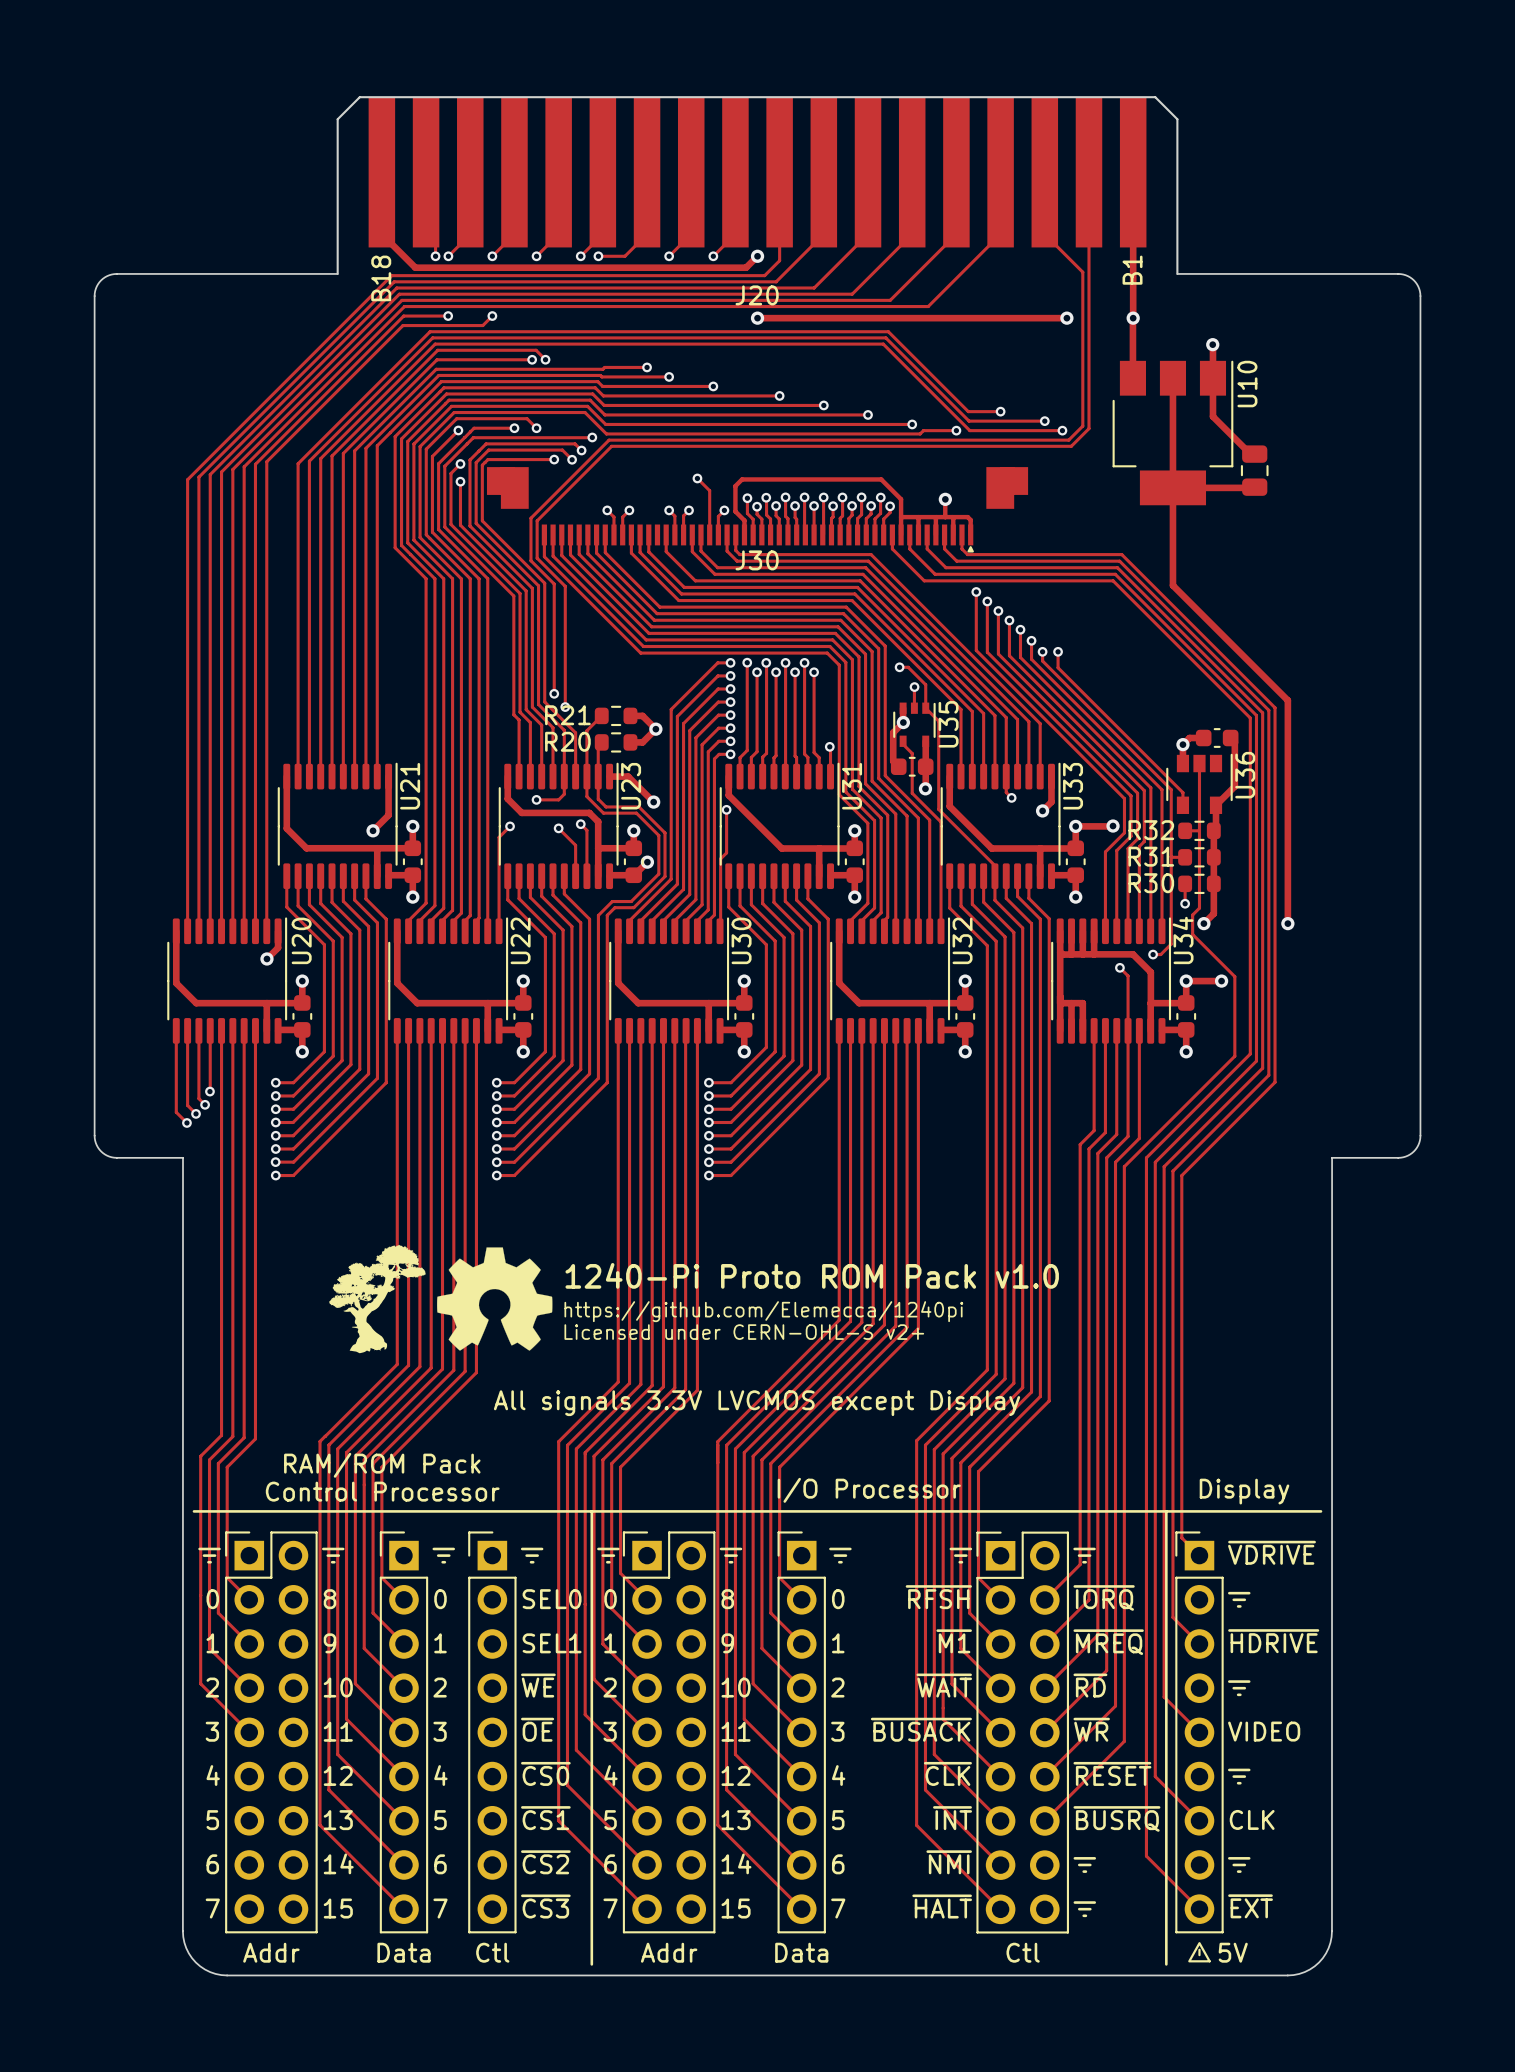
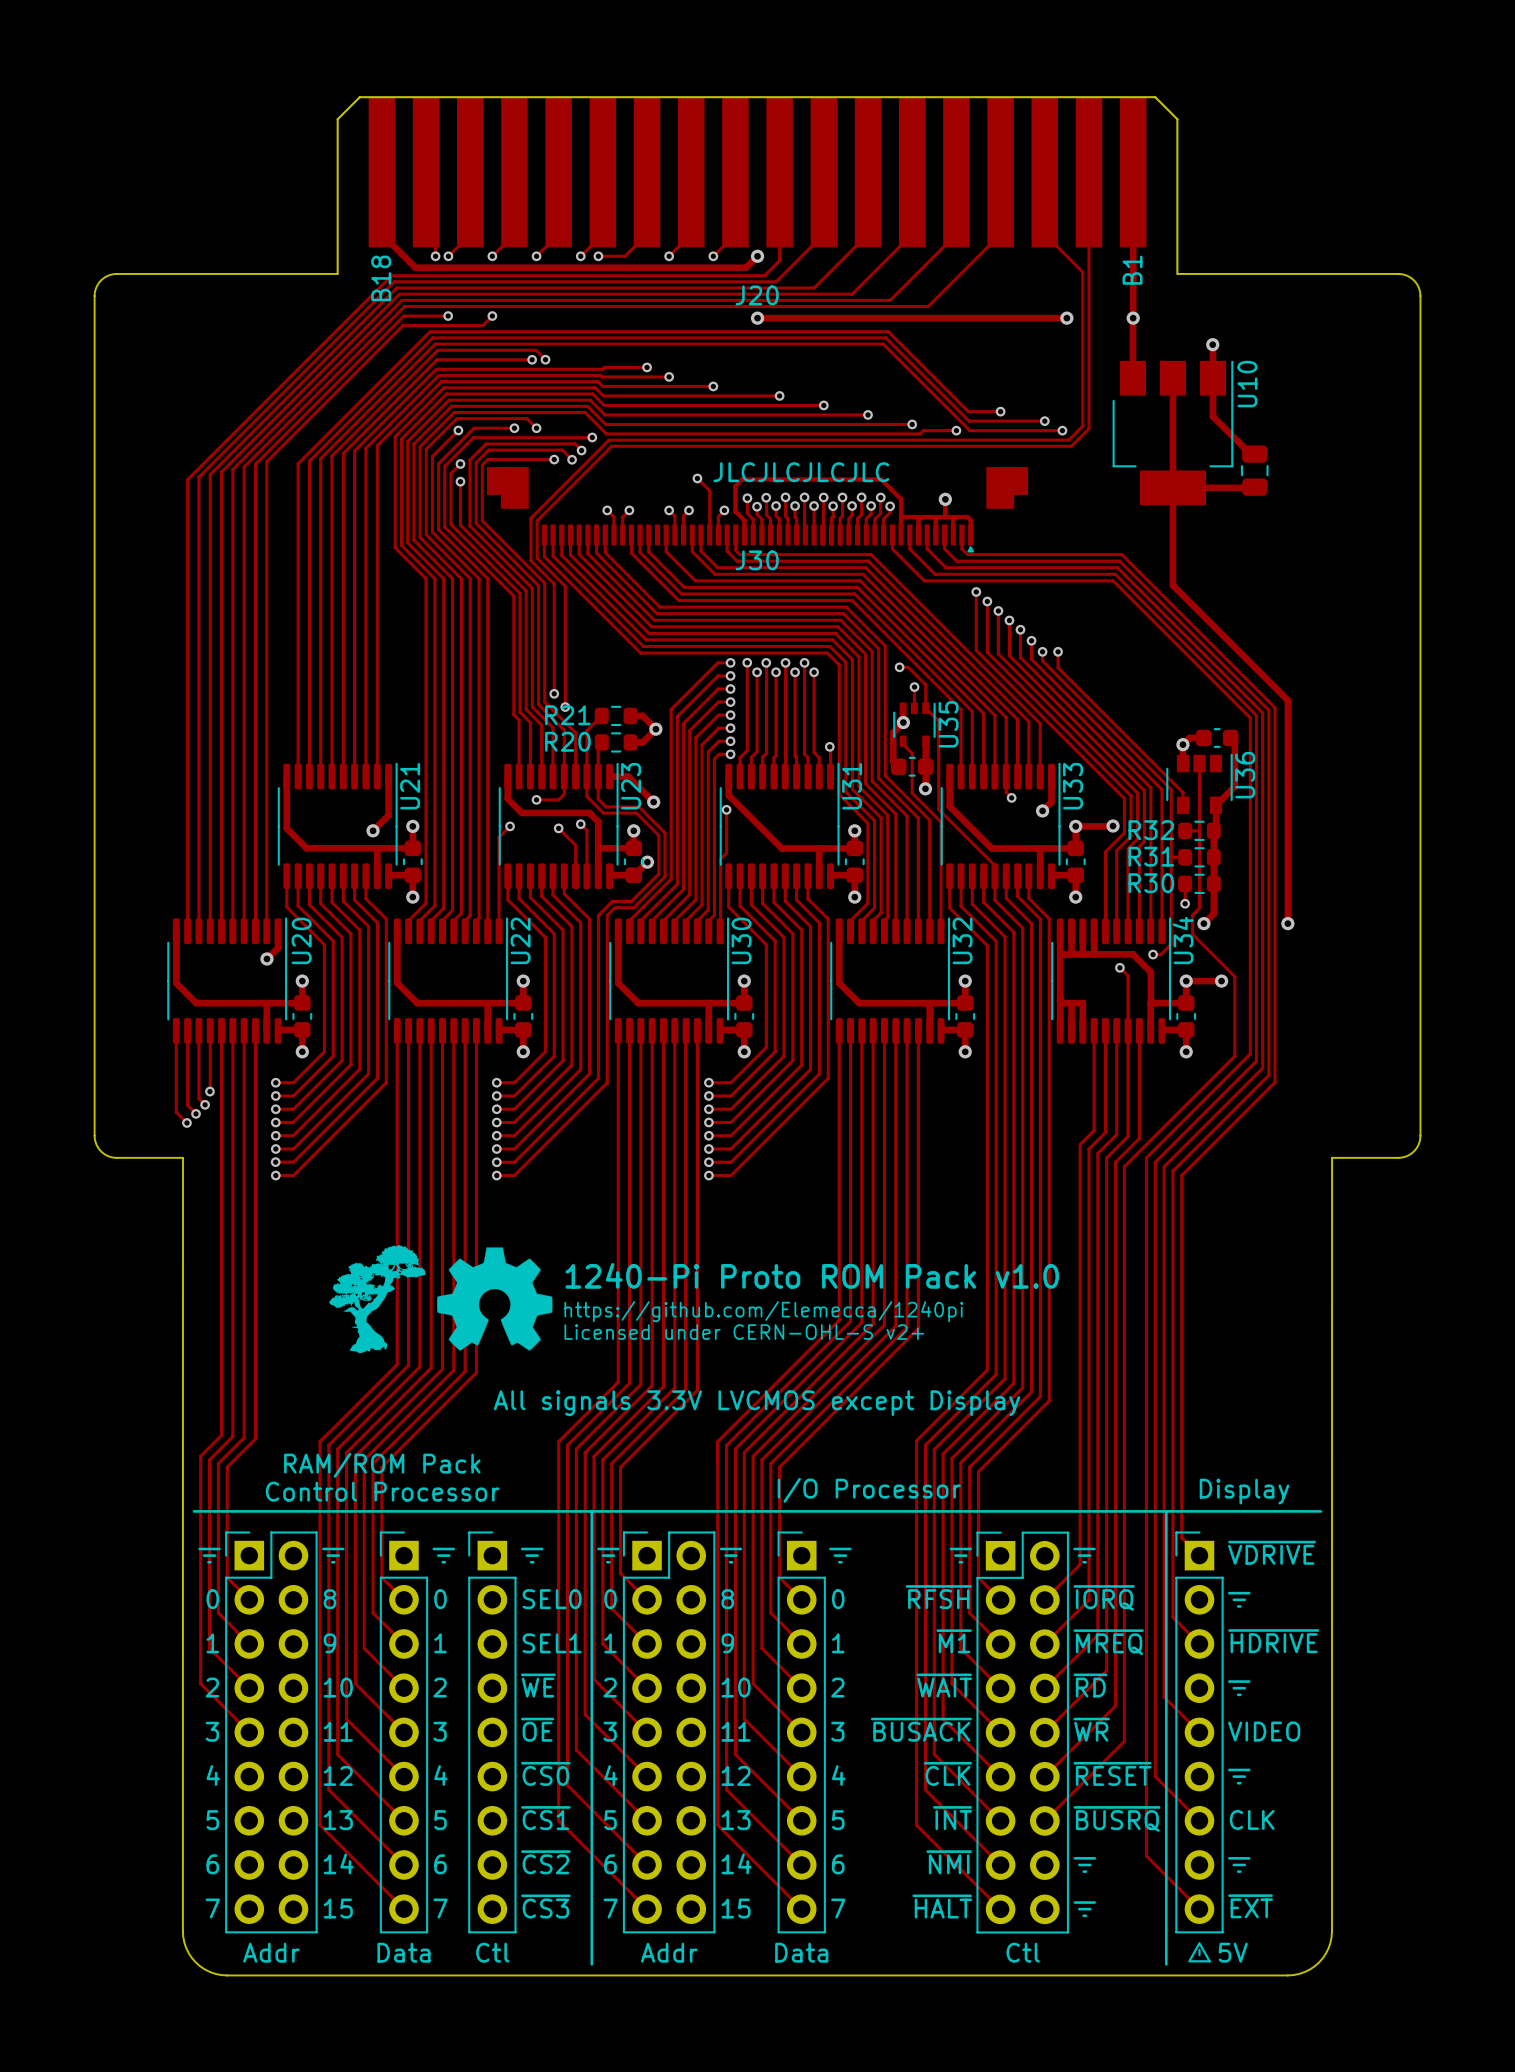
text: none -> JLCJLCJLCJLC (801, 472)

